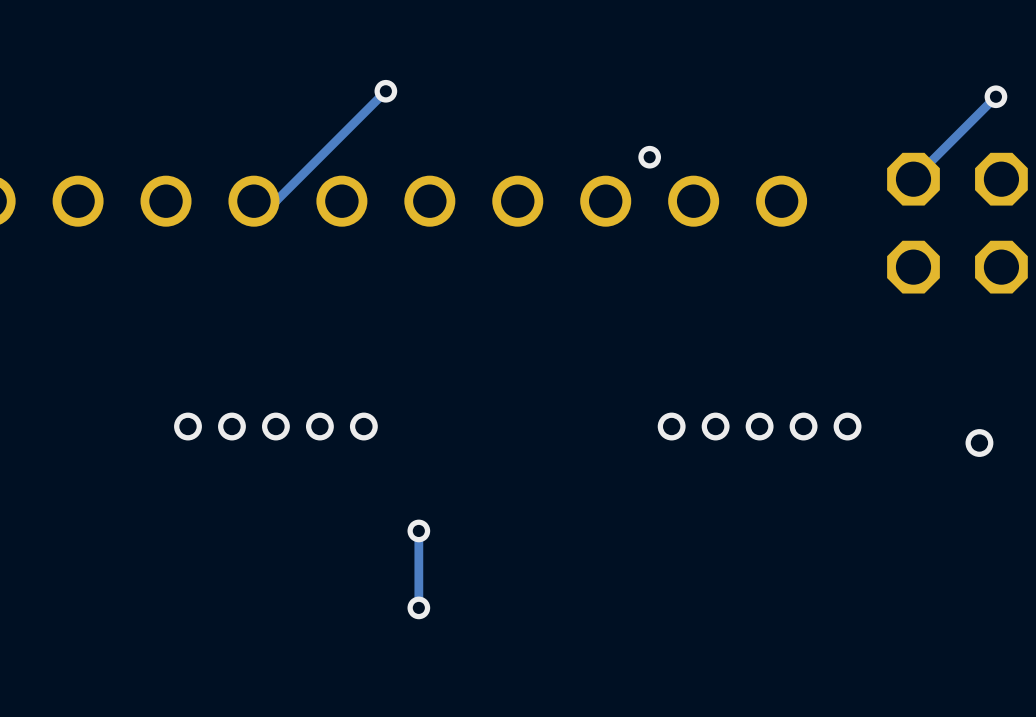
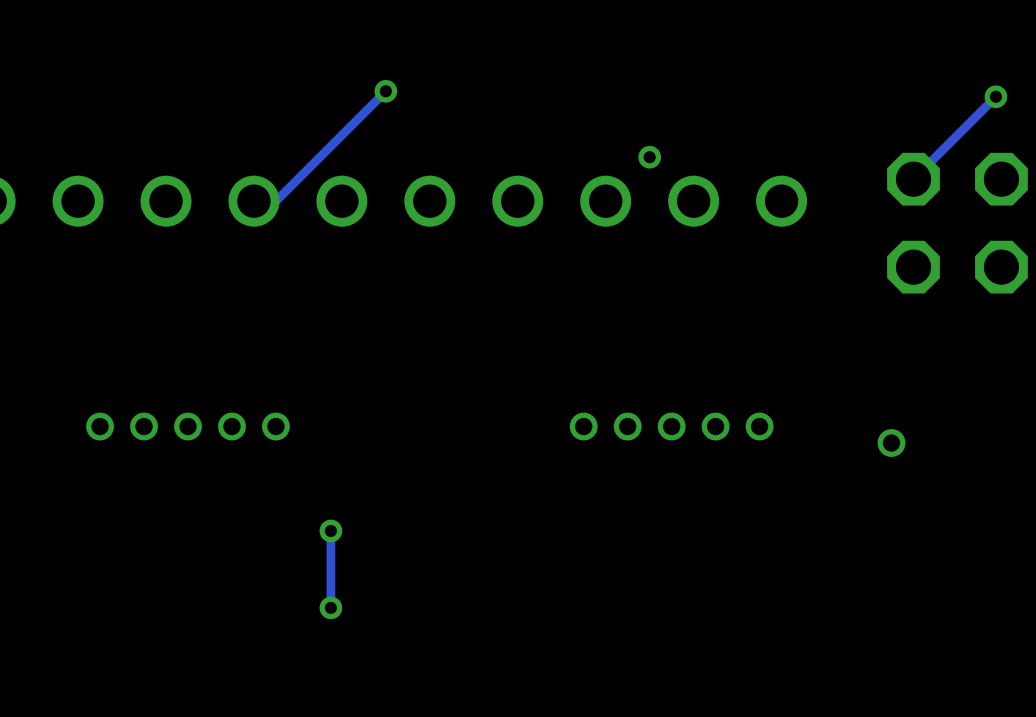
via: none -> (100, 426)
via: none -> (144, 426)
via: (319, 426) -> none
via: (363, 426) -> none
via: none -> (583, 426)
via: none -> (627, 426)
via: (803, 426) -> none
via: (847, 426) -> none
via: none -> (891, 443)
via: (979, 443) -> none
via: none -> (330, 530)
track: (418, 530) (418, 607) -> (330, 530) (330, 607)
via: (418, 530) -> none
via: none -> (330, 607)
via: (418, 607) -> none

